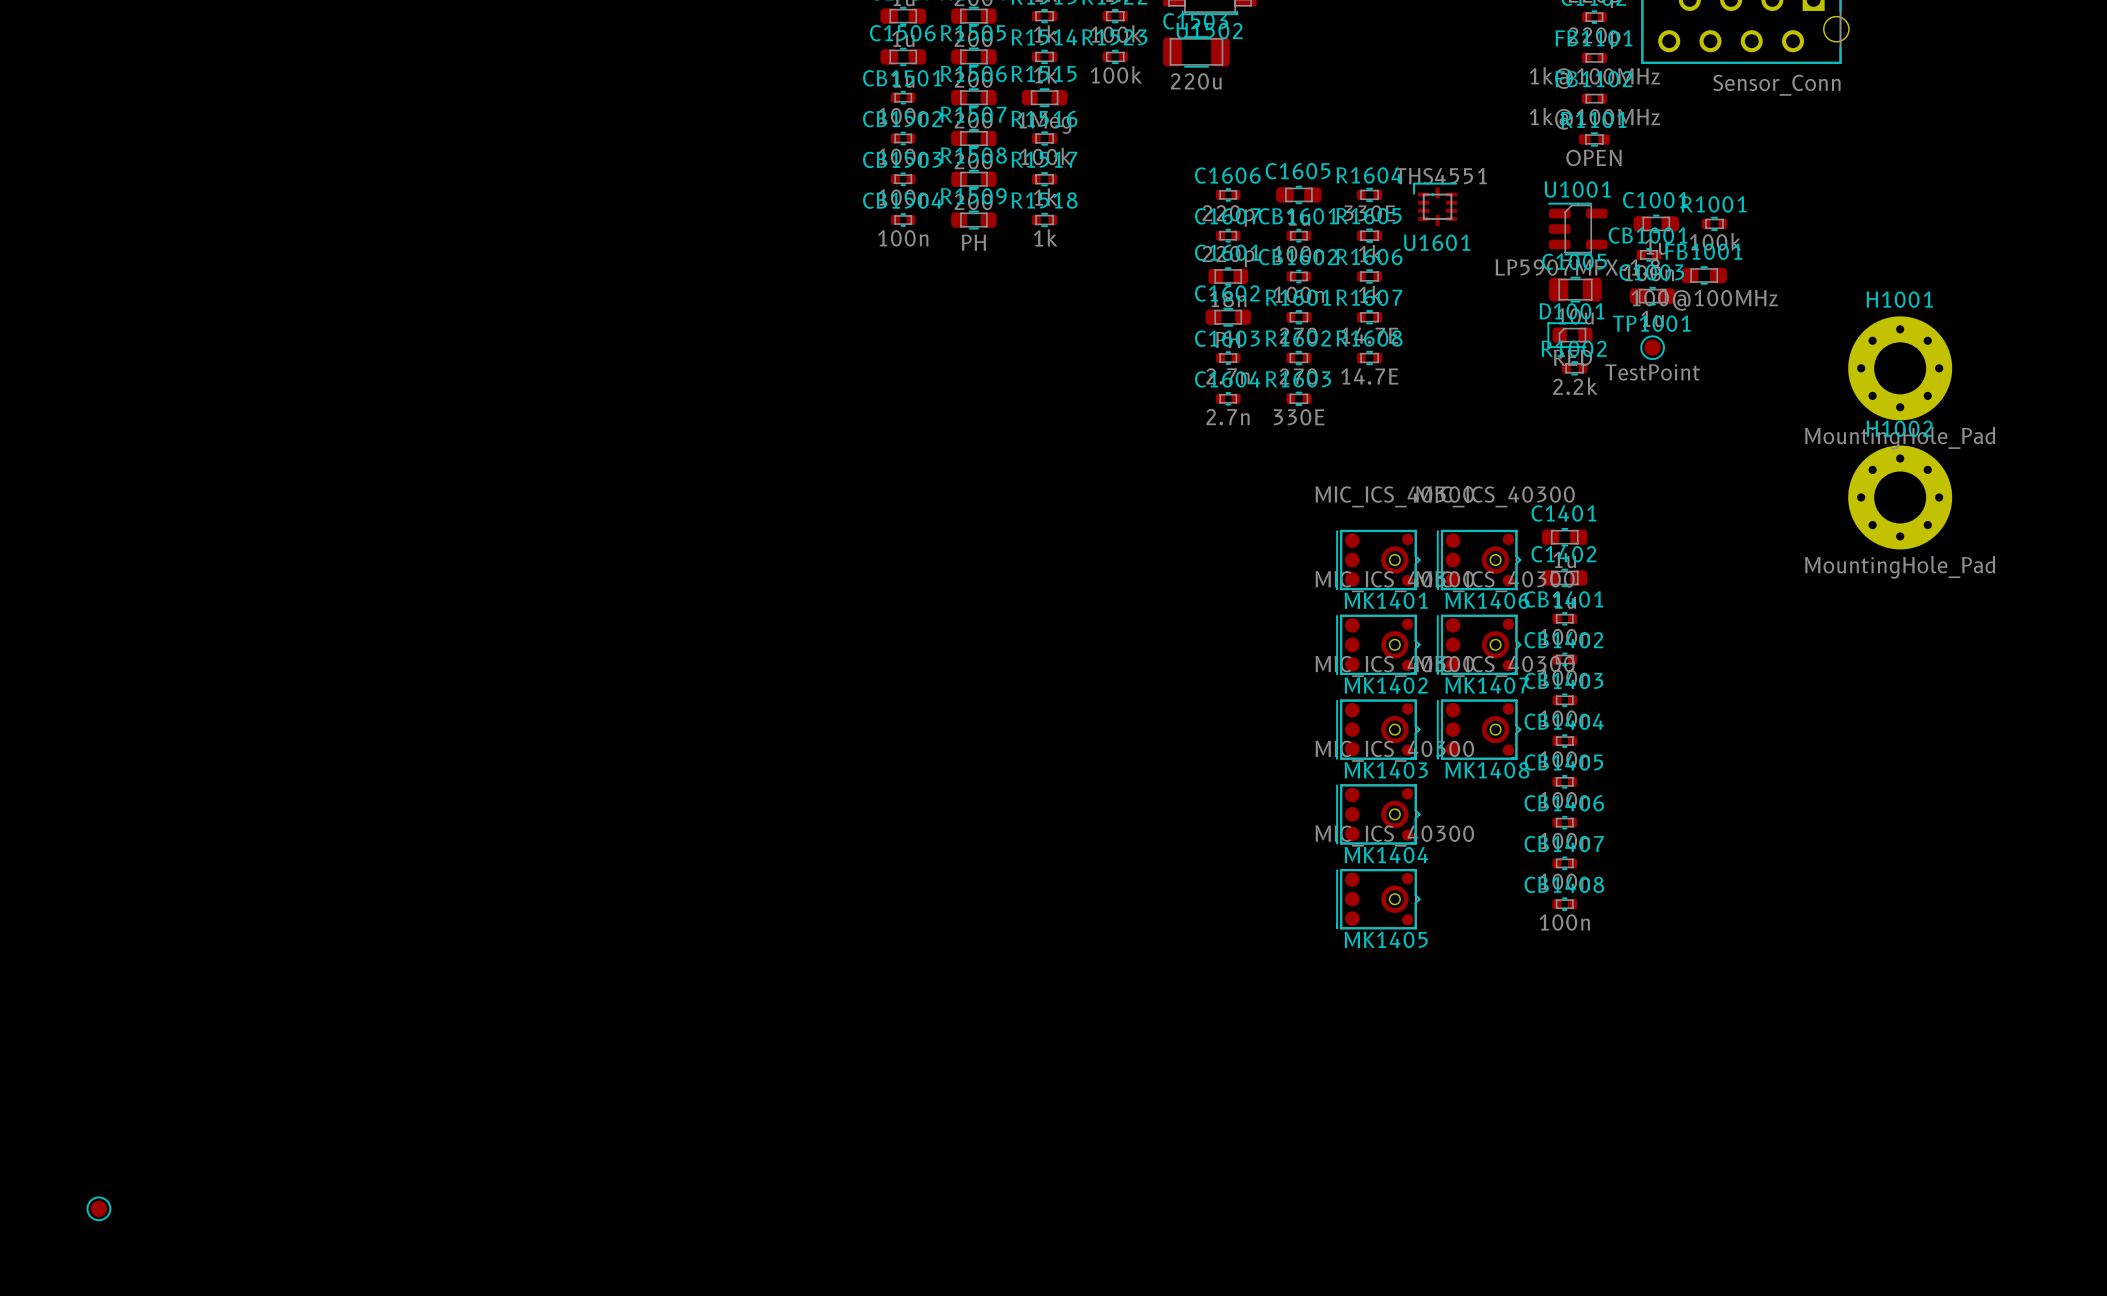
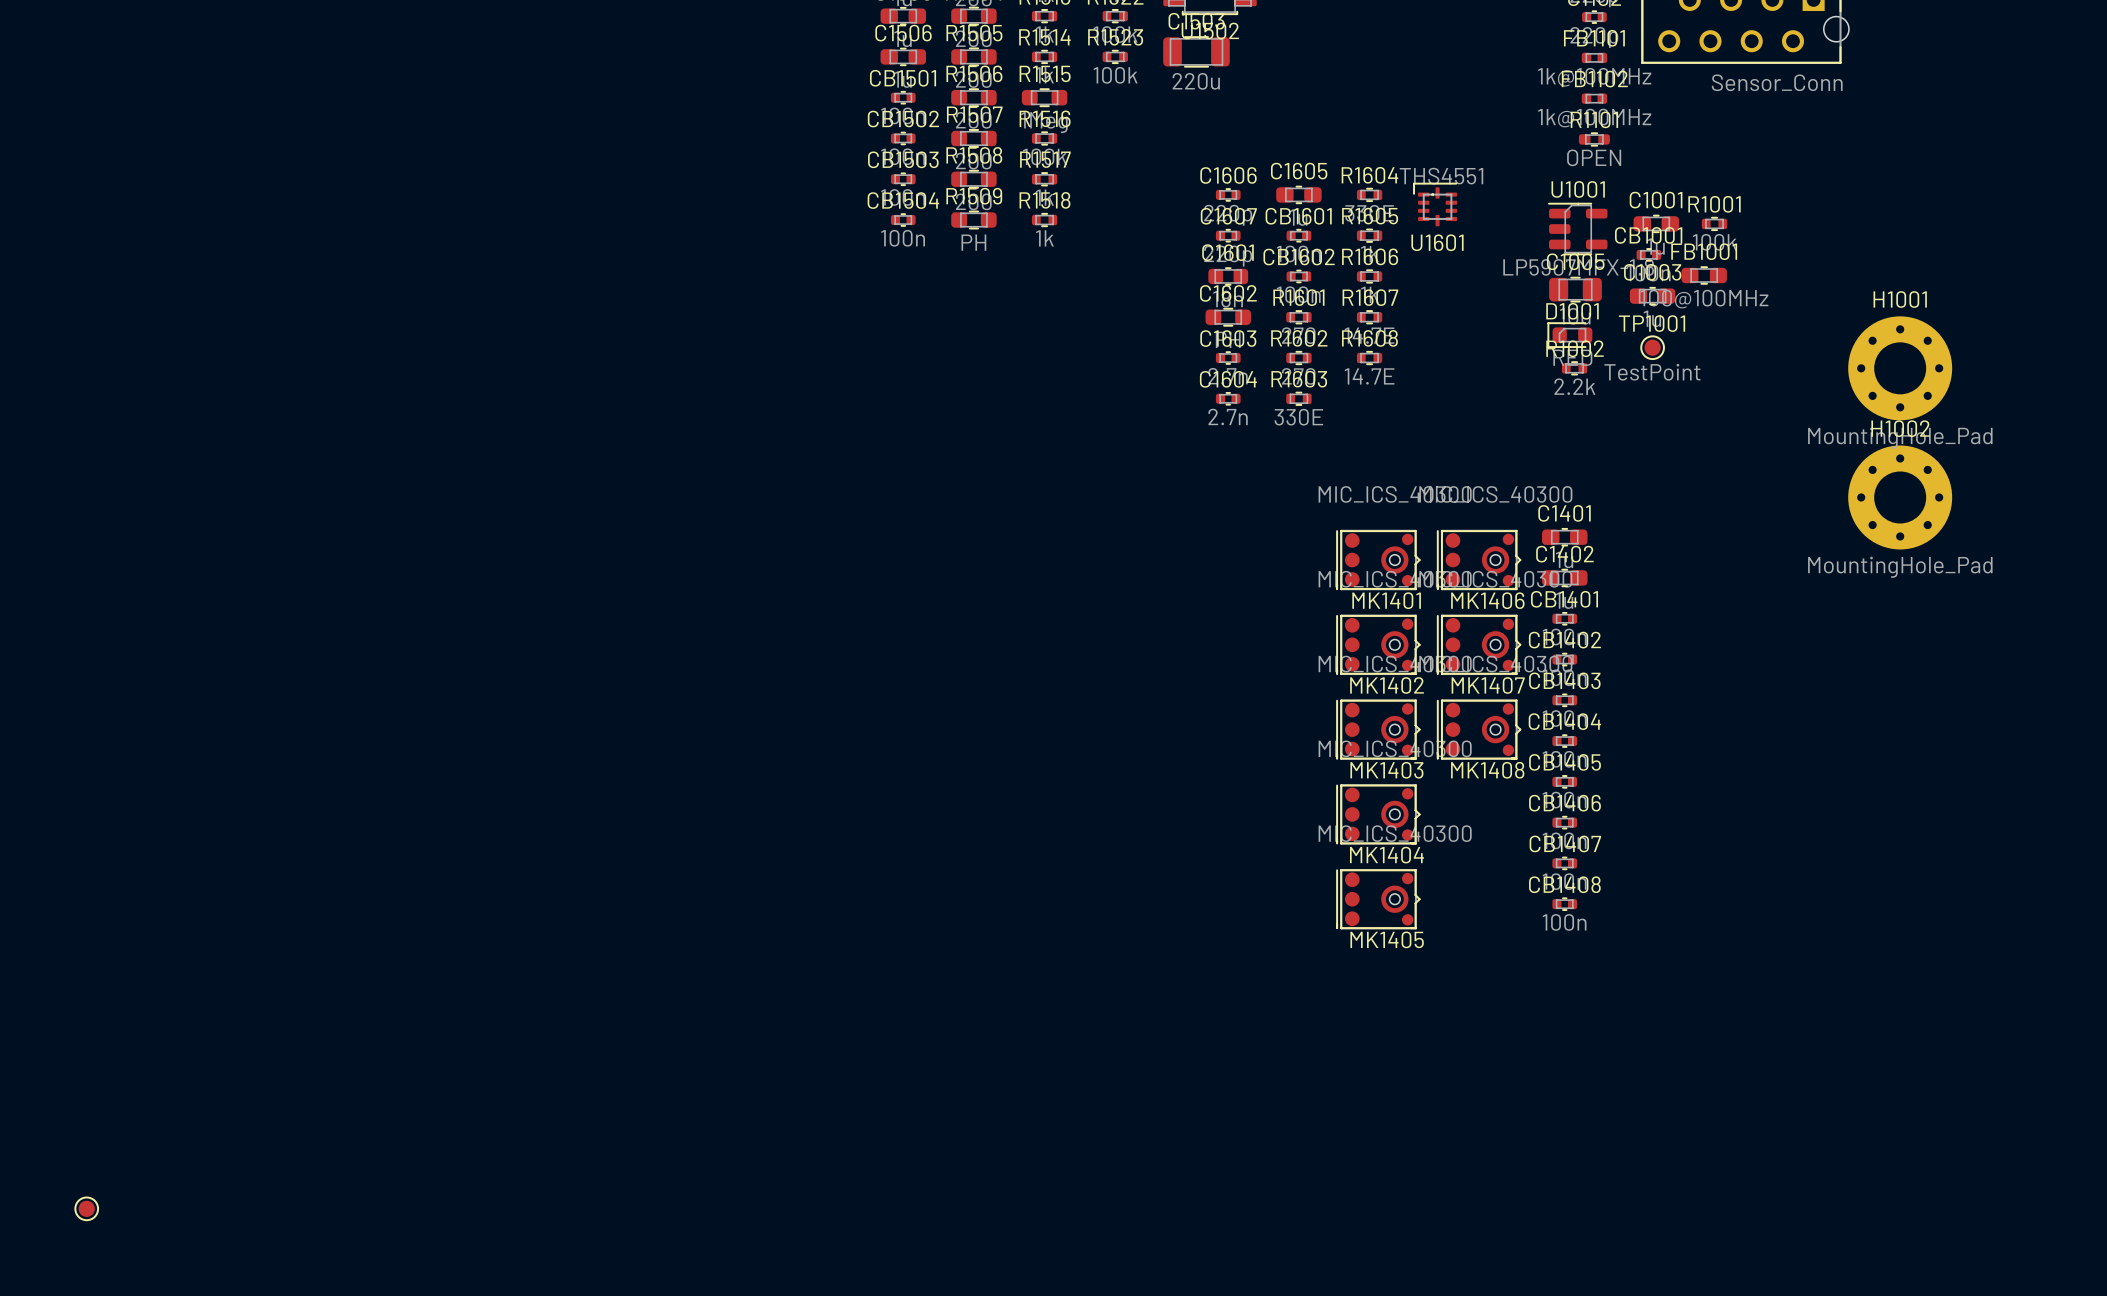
part position: (98, 1208) -> (86, 1208)

